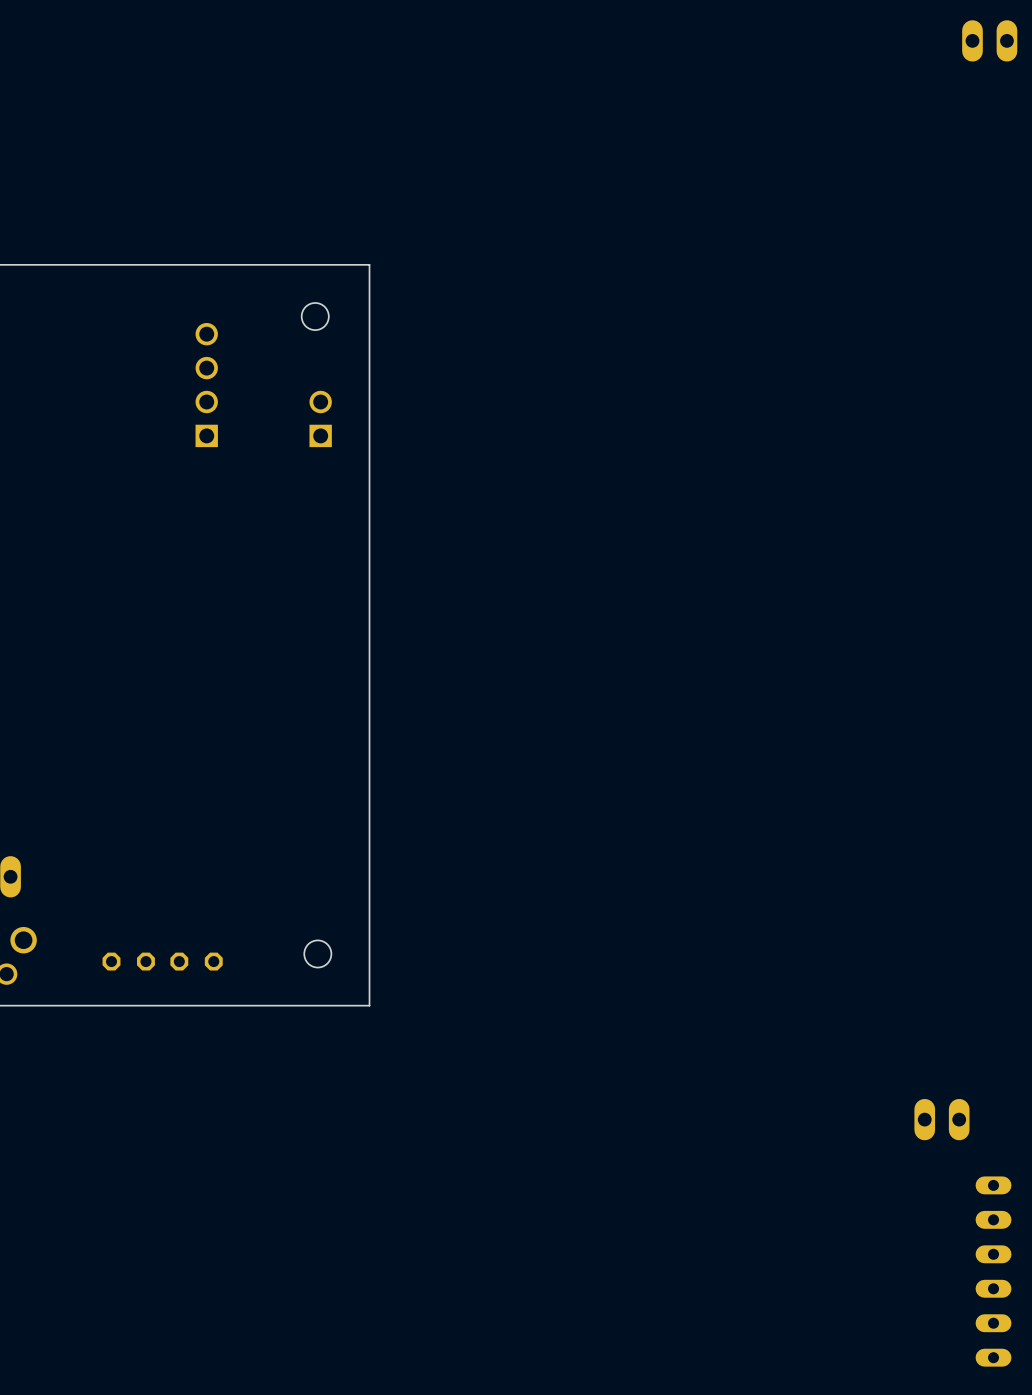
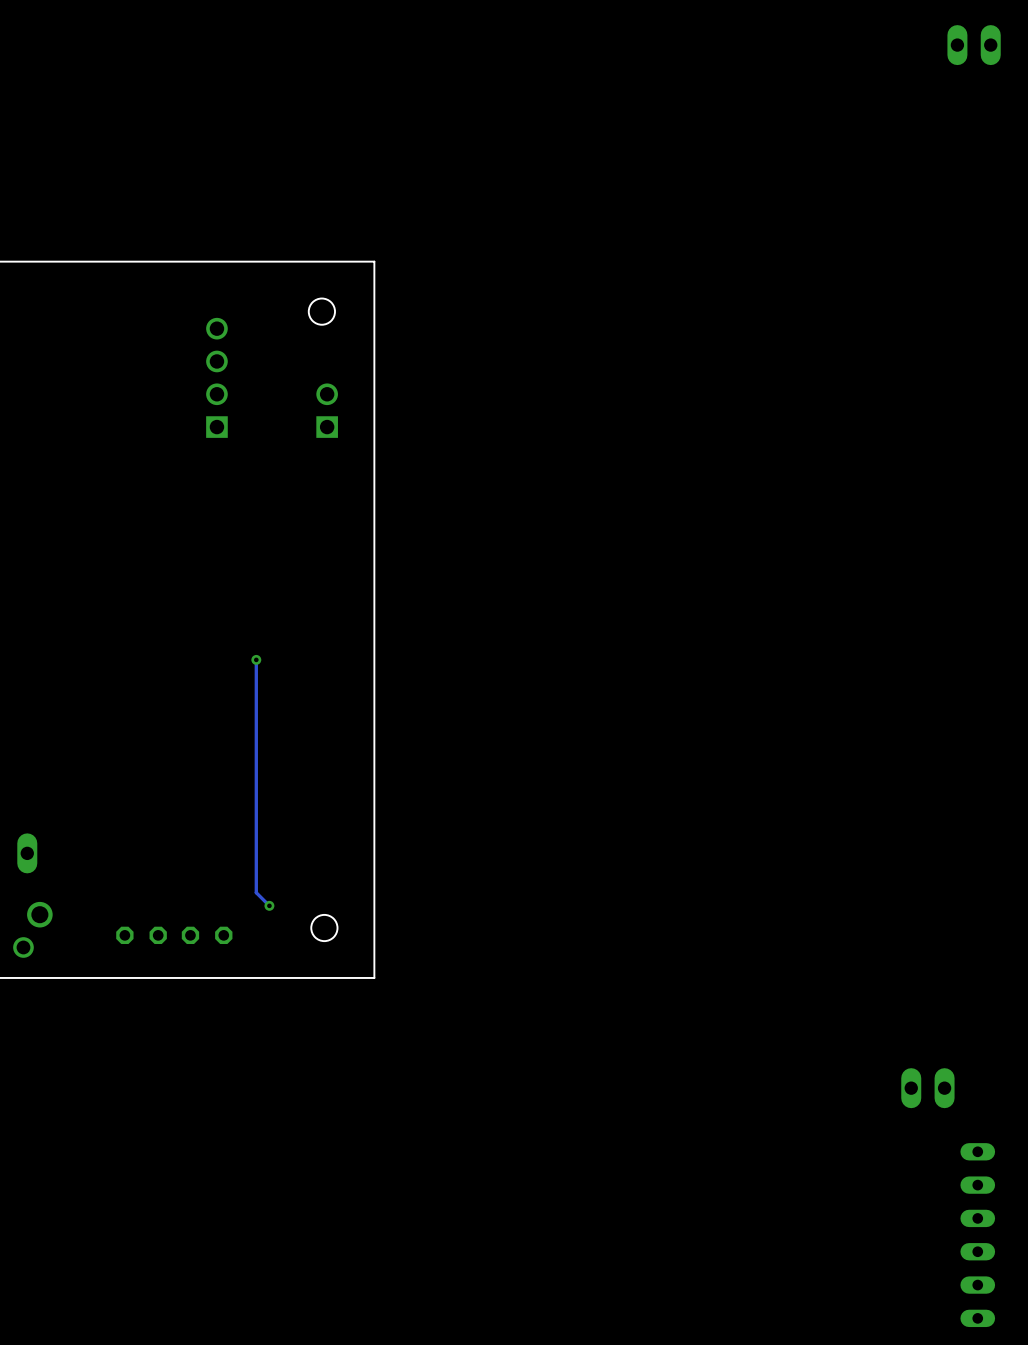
track: none -> (256, 659) (256, 892) (269, 905)
via: none -> (256, 659)
via: none -> (269, 905)

